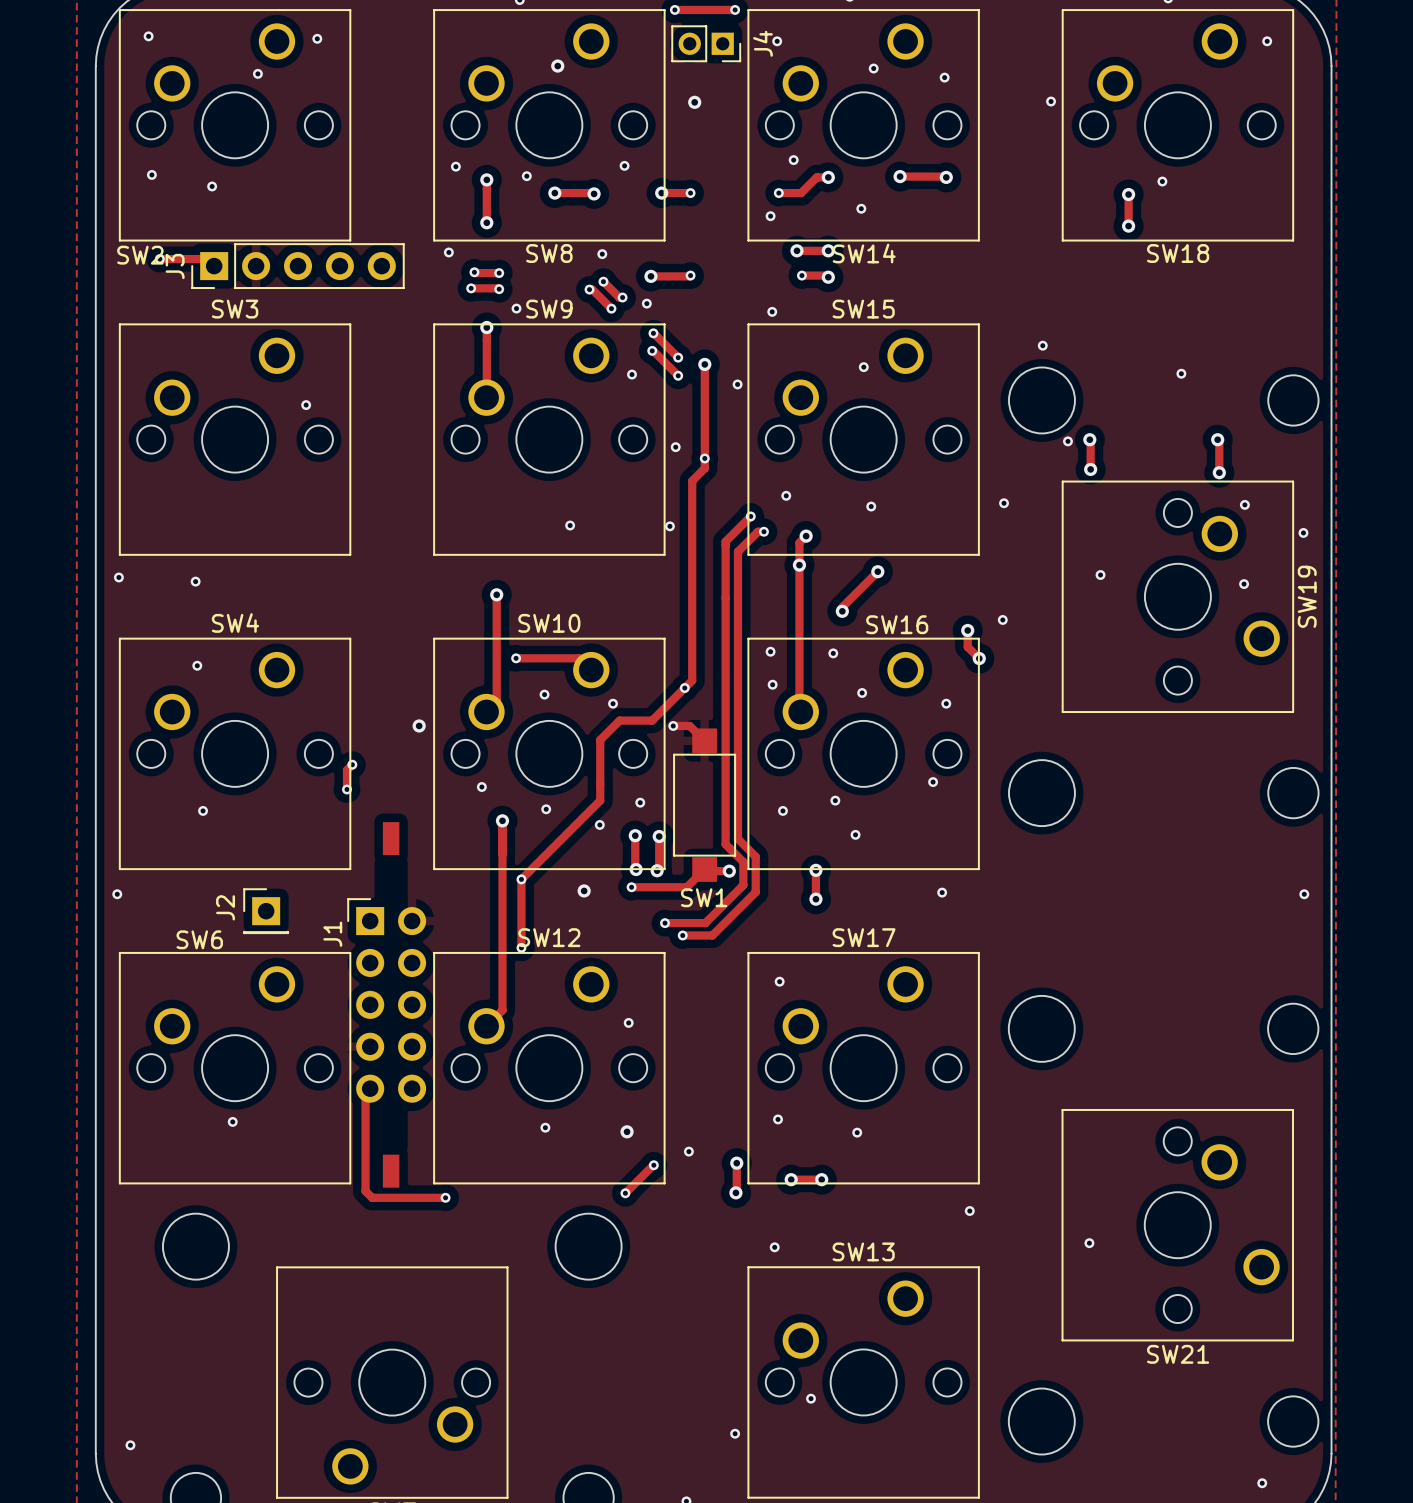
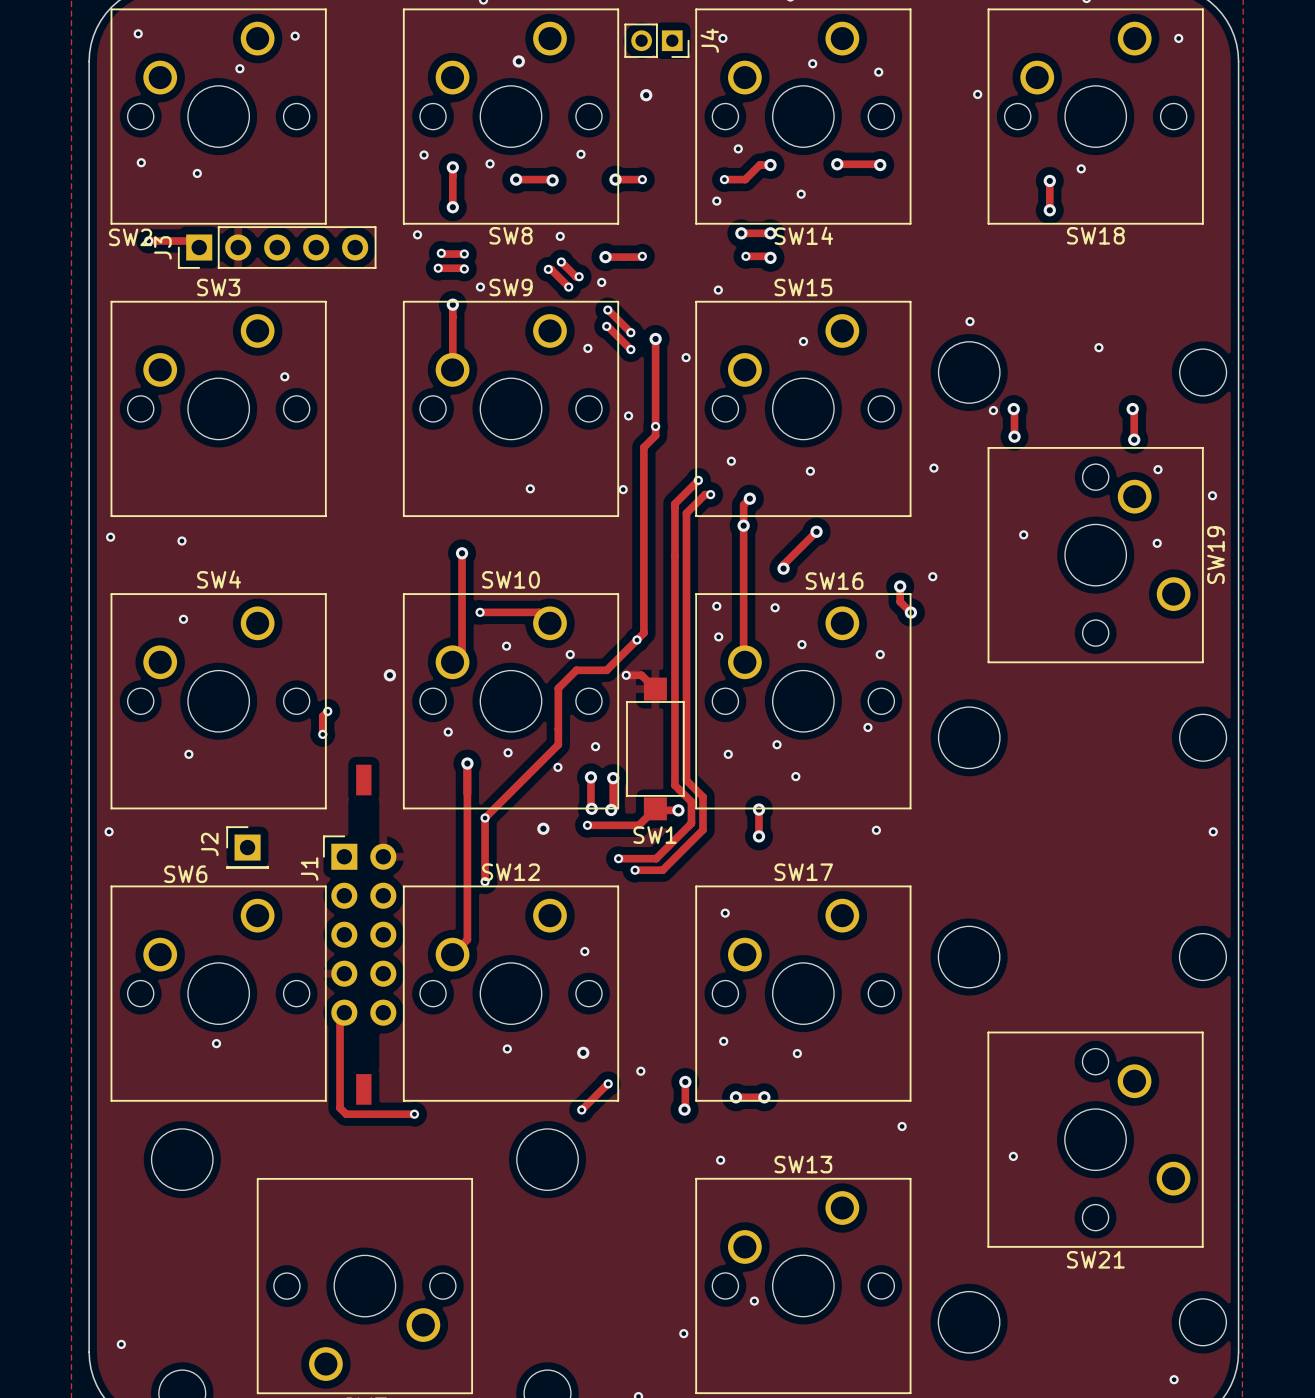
track: (674, 9) (735, 9) -> none
via: (674, 9) -> none
via: (735, 9) -> none

